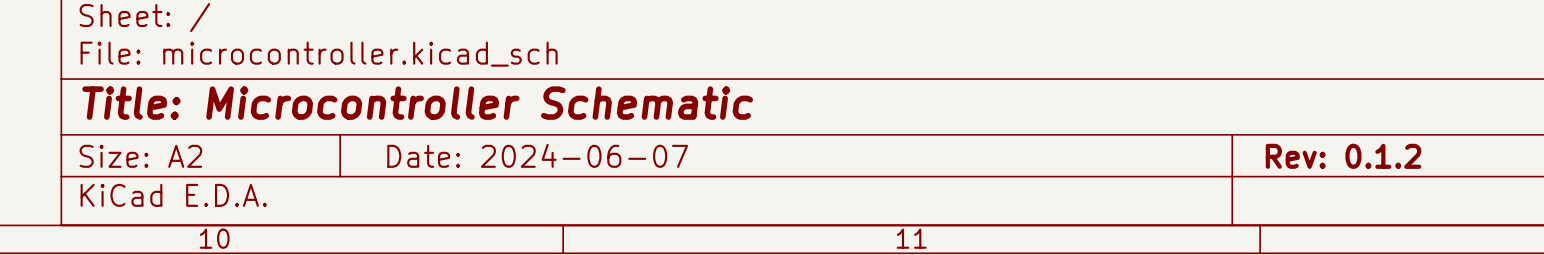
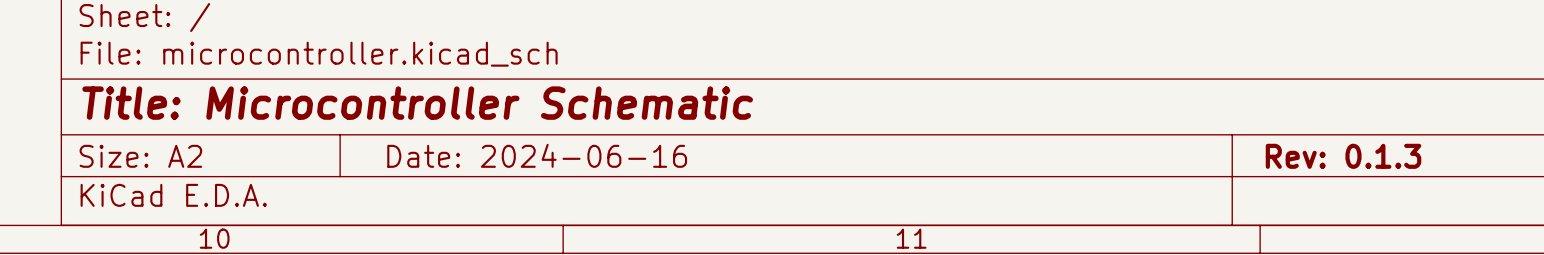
title block: Date: 2024-06-07 (537, 155) -> Date: 2024-06-16 (537, 155)
title block: Rev: 0.1.2 (1343, 156) -> Rev: 0.1.3 (1343, 156)

